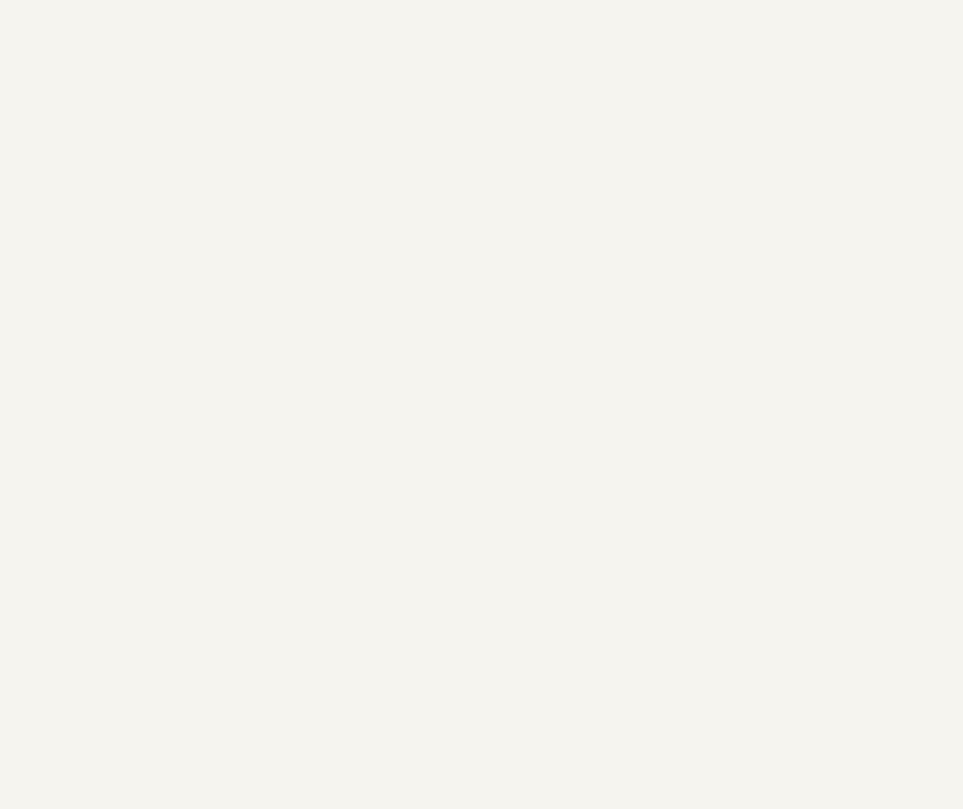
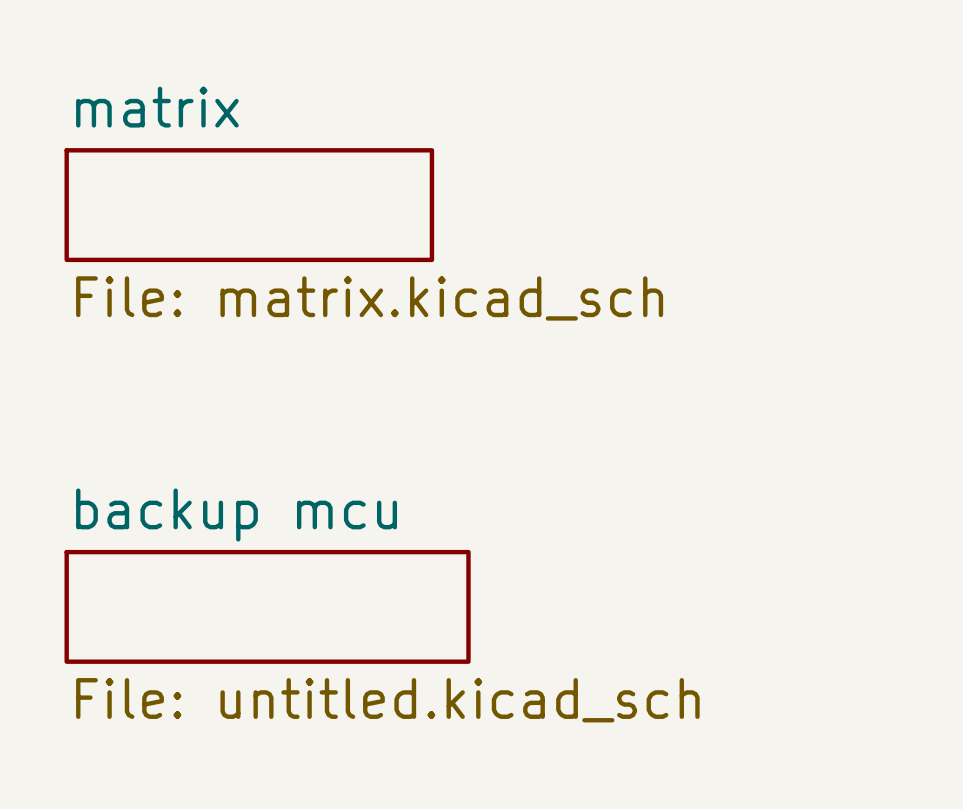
sheet matrix: none -> File: matrix.kicad_sch (249, 205)
sheet backup mcu: none -> File: untitled.kicad_sch (267, 606)

